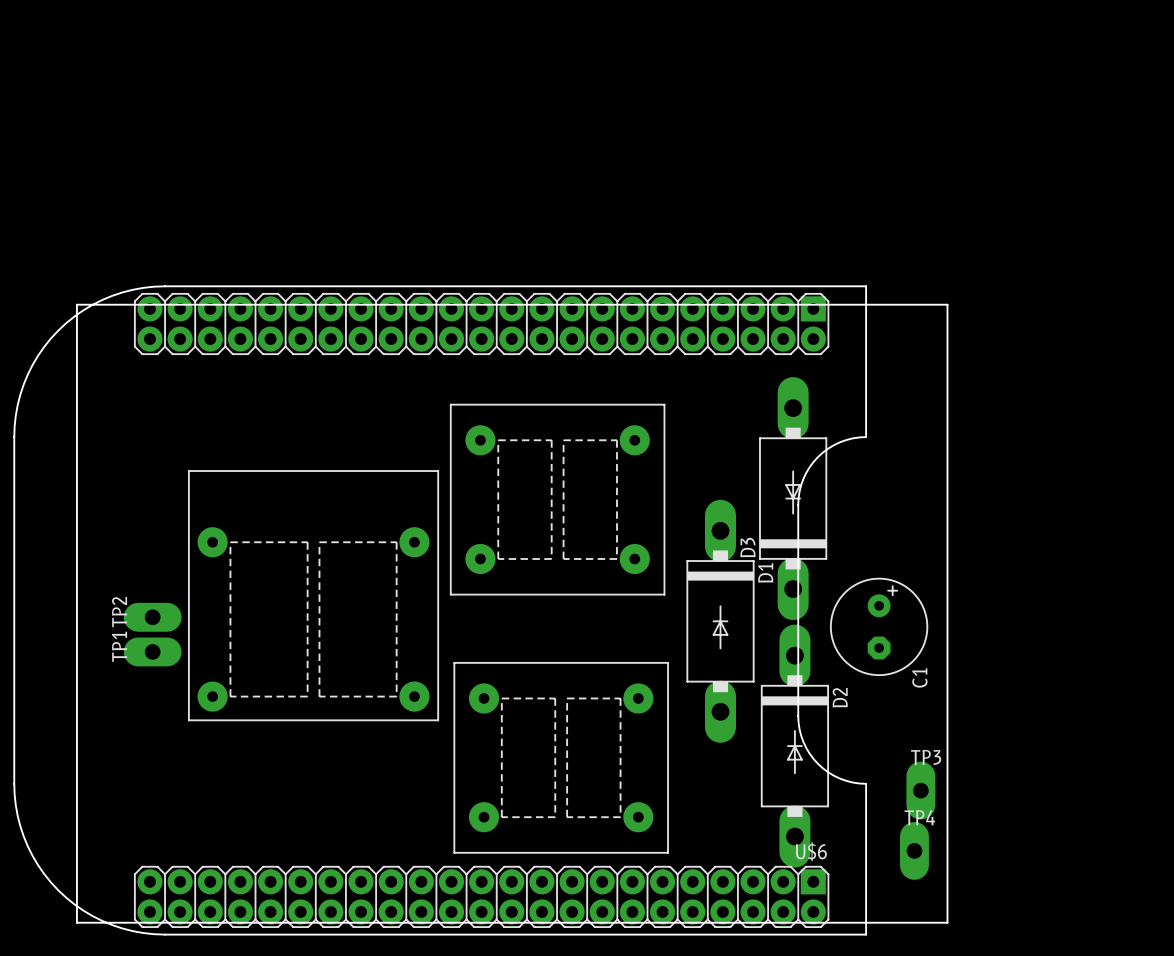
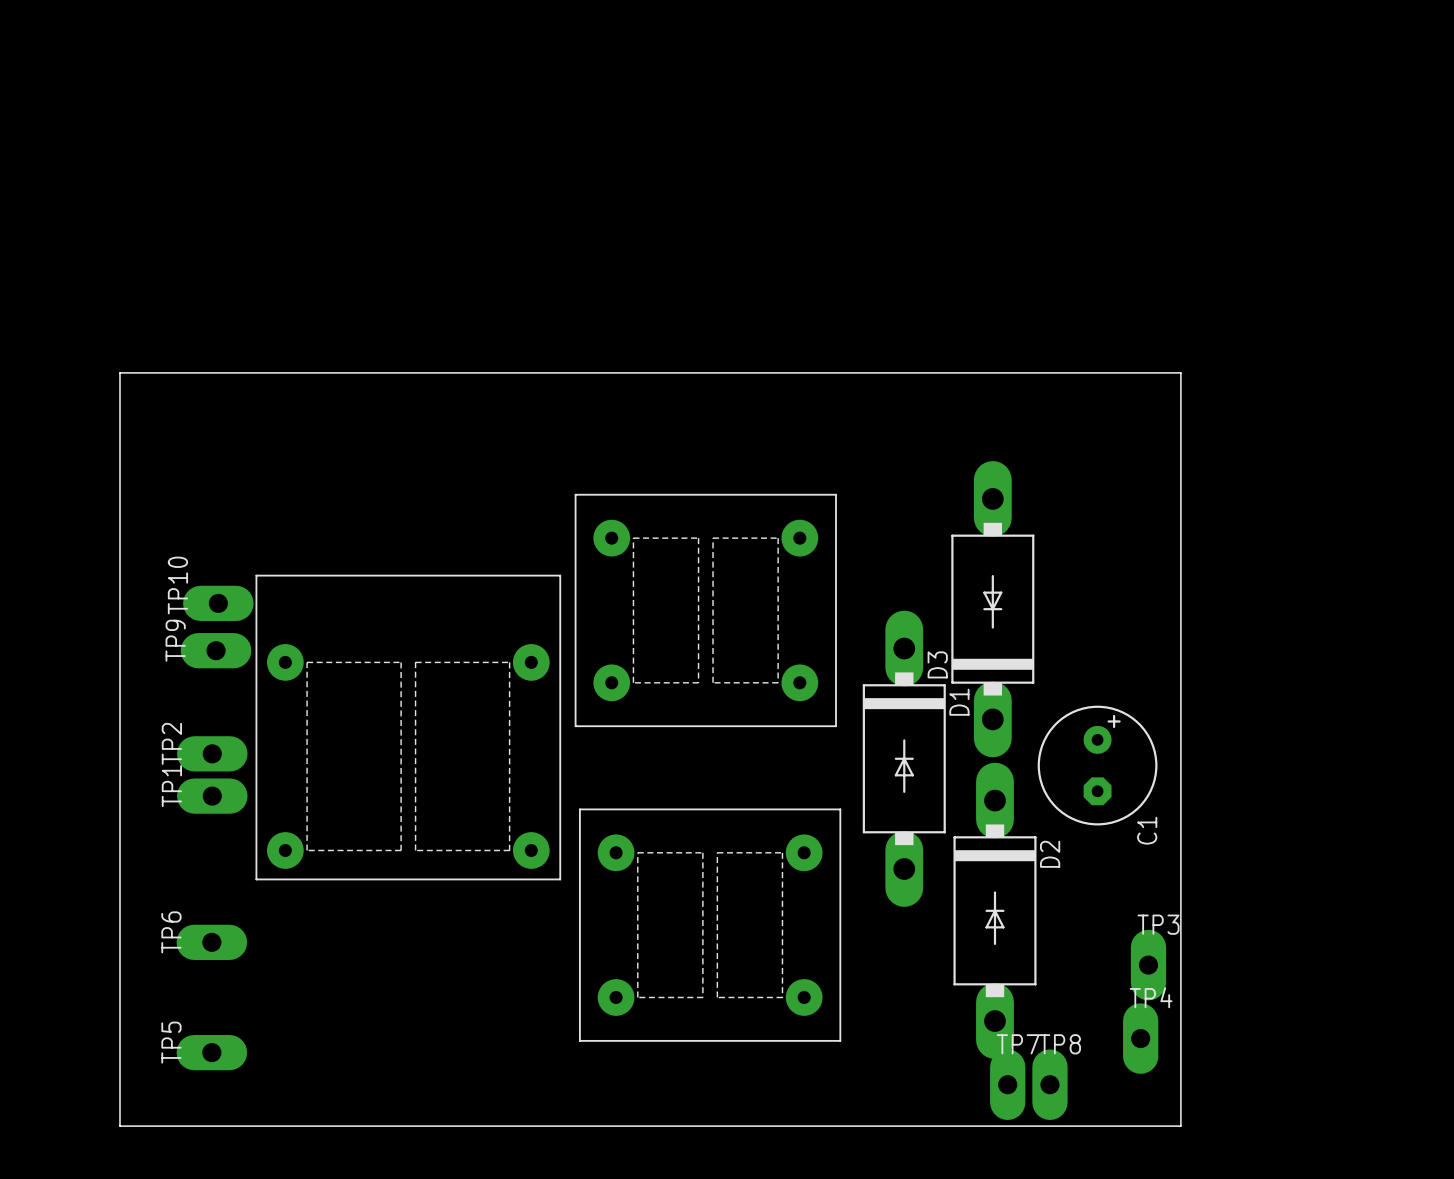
TP10: none -> (218, 603)
TP9: none -> (216, 650)
U$6: (440, 610) -> none
TP6: none -> (211, 942)
TP5: none -> (211, 1052)
TP7: none -> (1007, 1084)
TP8: none -> (1049, 1084)

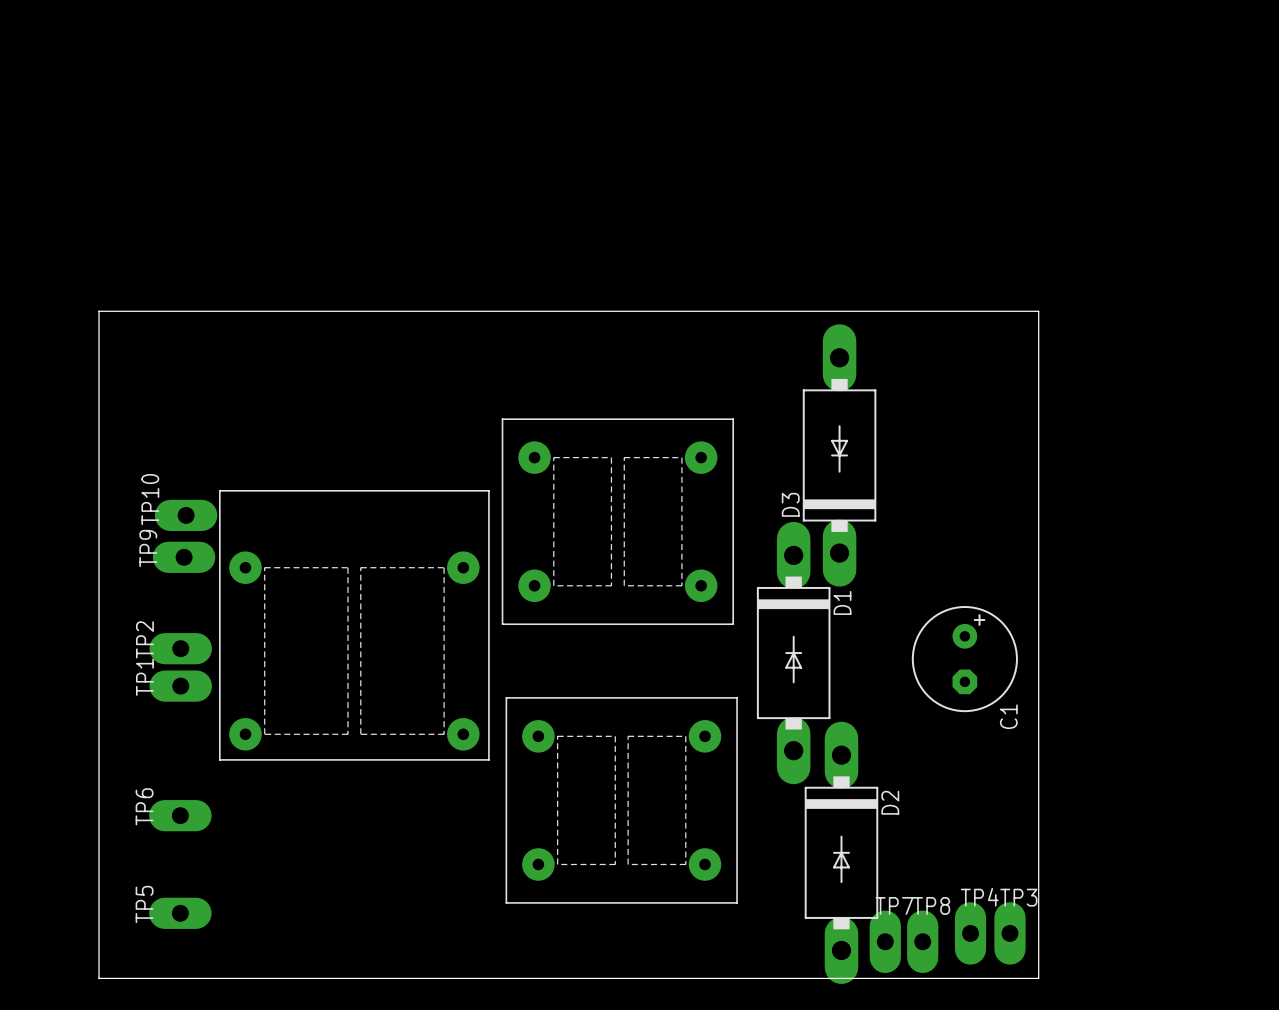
D3 position: (992, 609) -> (839, 455)
D2 position: (994, 910) -> (841, 852)
TP3 position: (1148, 965) -> (1009, 933)
TP4 position: (1140, 1038) -> (970, 933)

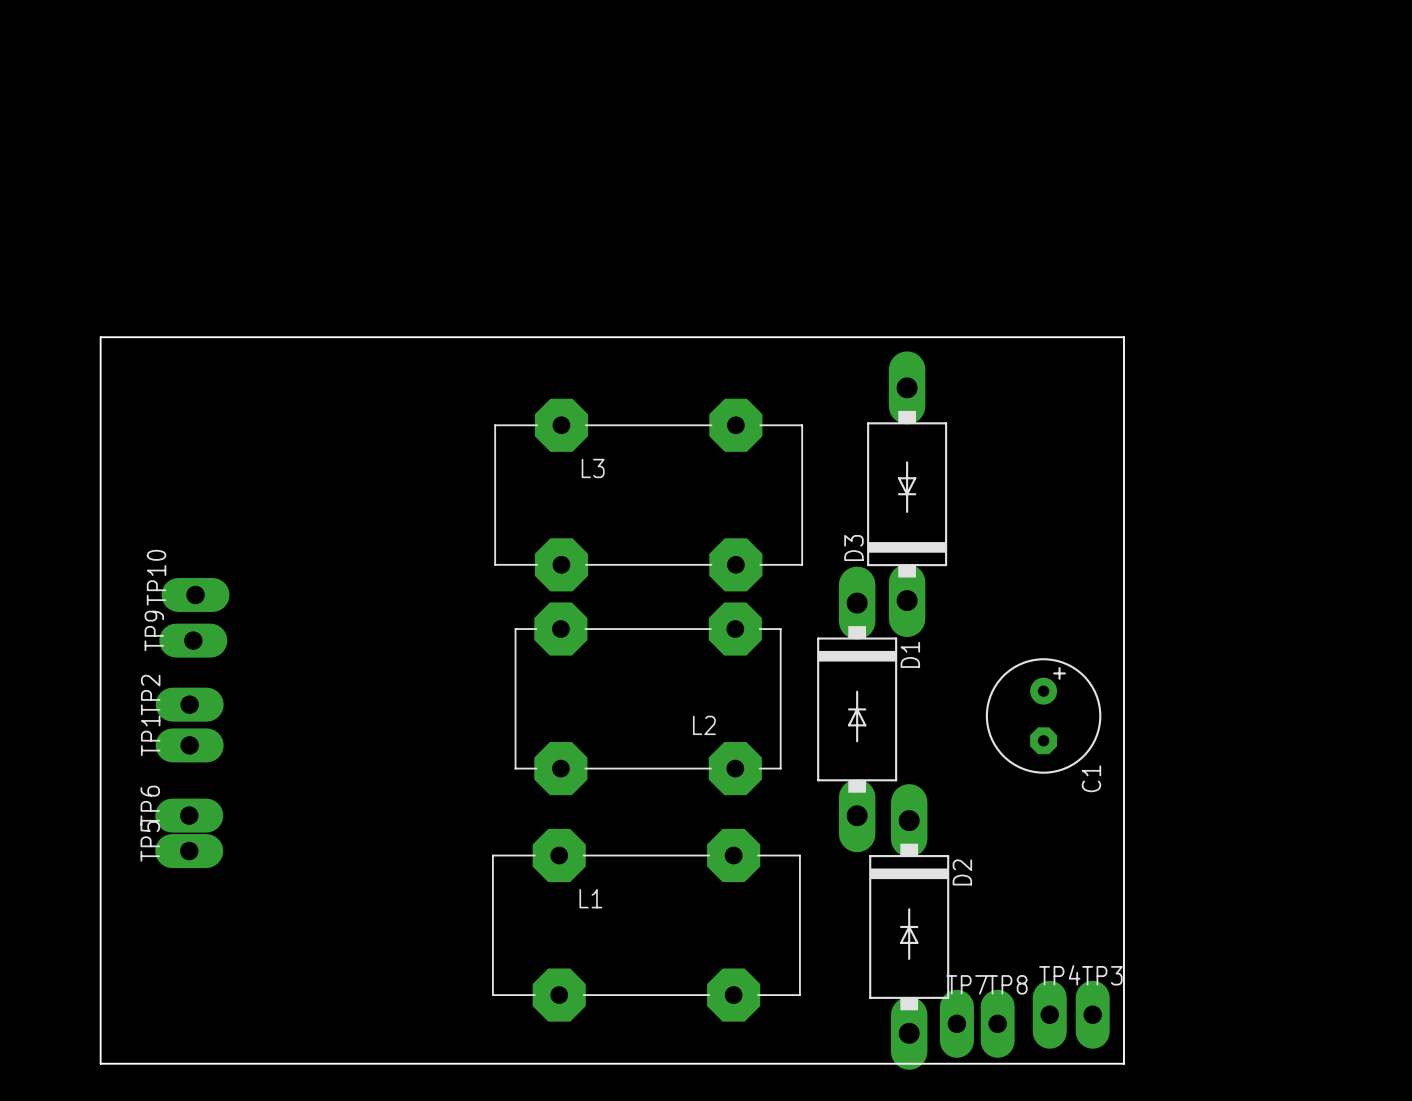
L3: none -> (648, 495)
TP10 position: (186, 515) -> (195, 594)
part: (617, 521) -> none
TP9 position: (184, 557) -> (193, 640)
part: (354, 625) -> none
L2: none -> (648, 698)
part: (621, 800) -> none
TP6 position: (180, 815) -> (189, 815)
L1: none -> (646, 925)
TP5 position: (180, 913) -> (189, 851)

